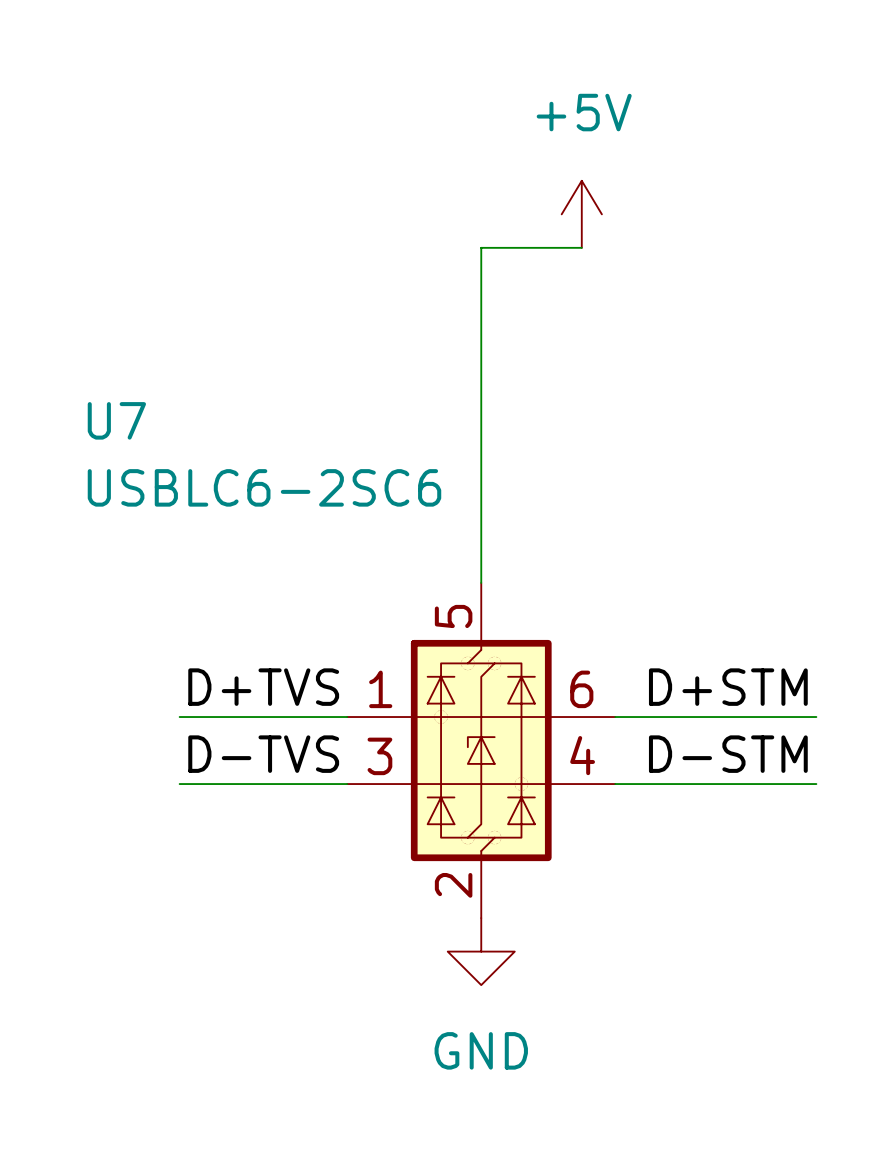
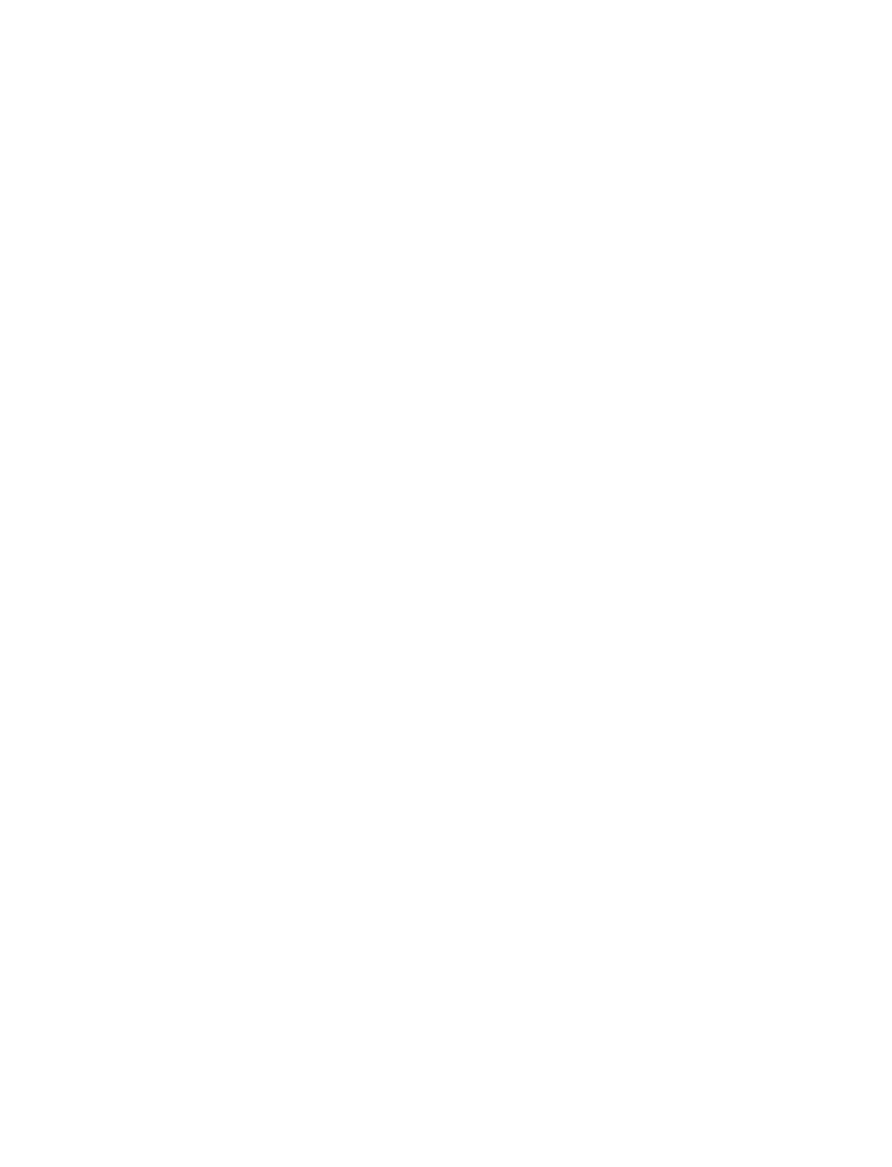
power symbol: +5V (581, 214) -> none
wire: (581, 247) (481, 247) (481, 582) -> none
label: D+TVS (263, 687) -> none
label: D+STM (728, 687) -> none
wire: (179, 717) (347, 717) -> none
wire: (615, 717) (816, 717) -> none
U7: USBLC6-2SC6 (481, 750) -> none
label: D-TVS (263, 754) -> none
label: D-STM (728, 754) -> none
wire: (179, 784) (347, 784) -> none
wire: (615, 784) (816, 784) -> none
power symbol: GND (481, 951) -> none

